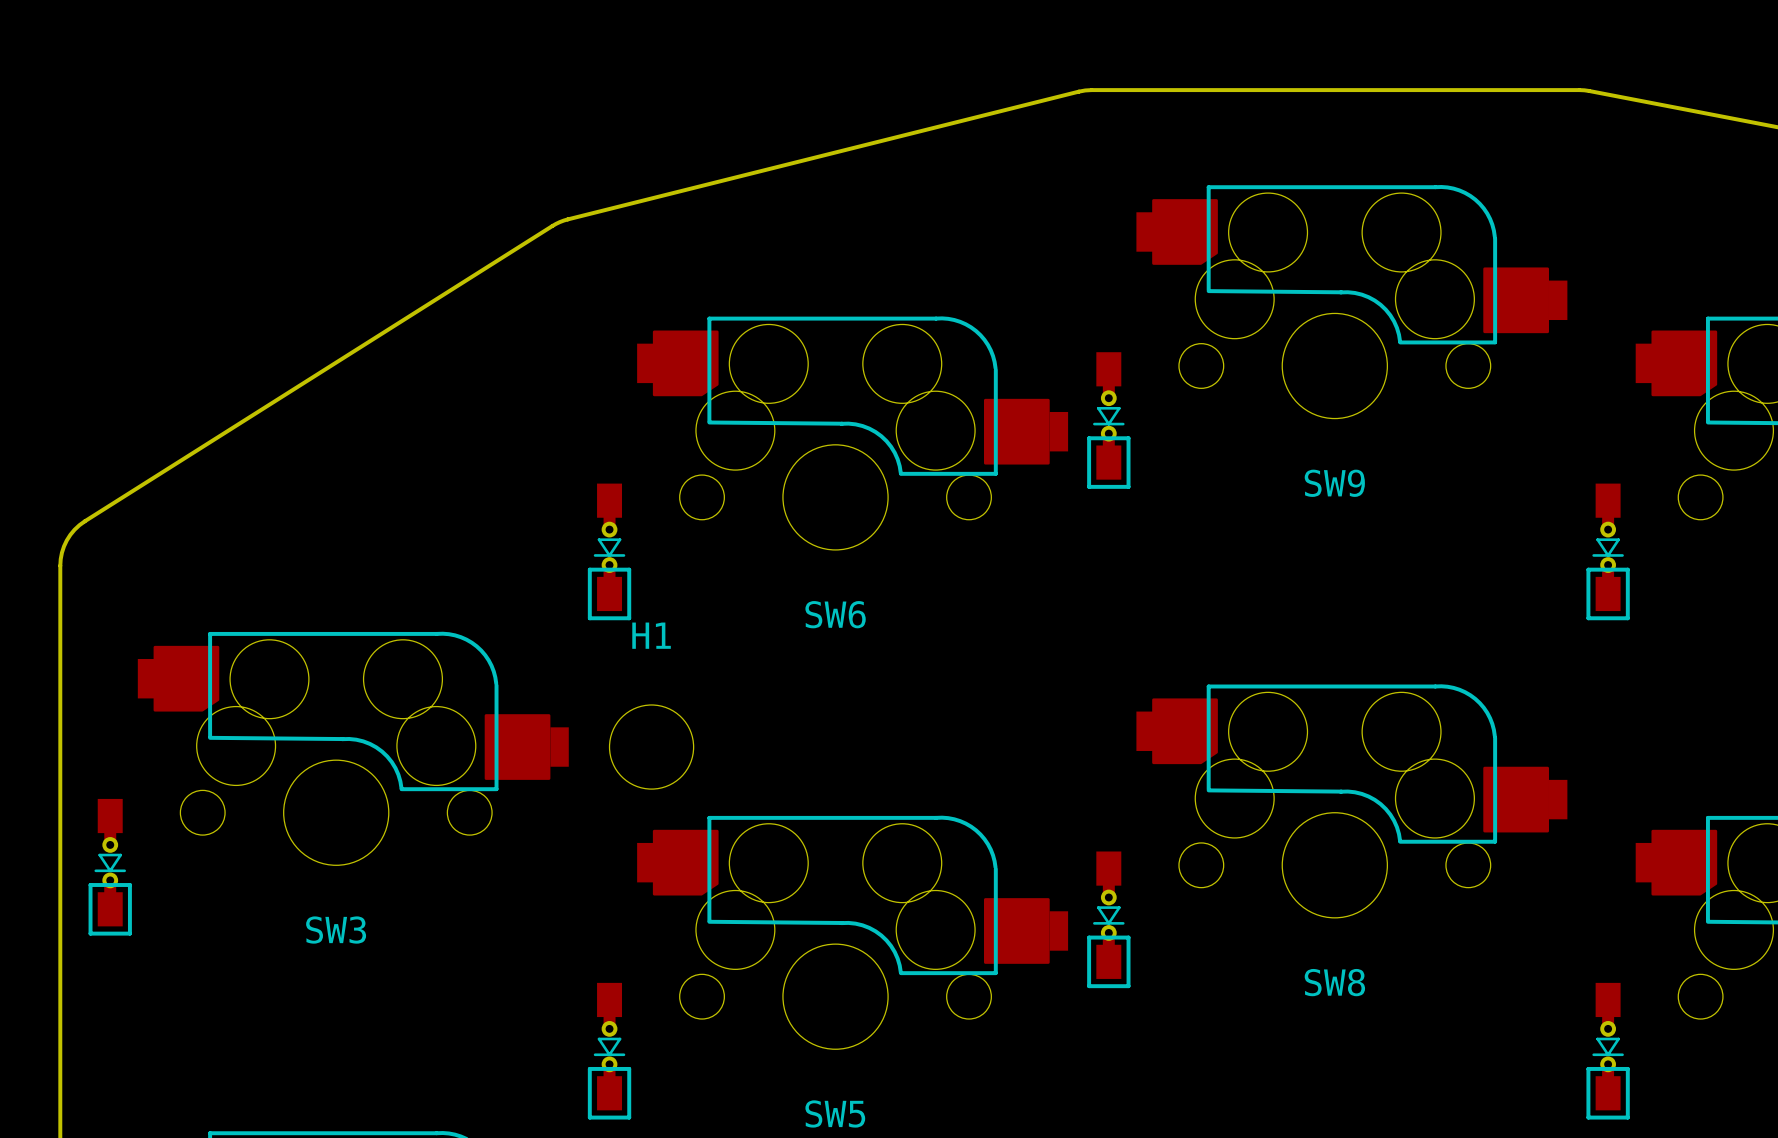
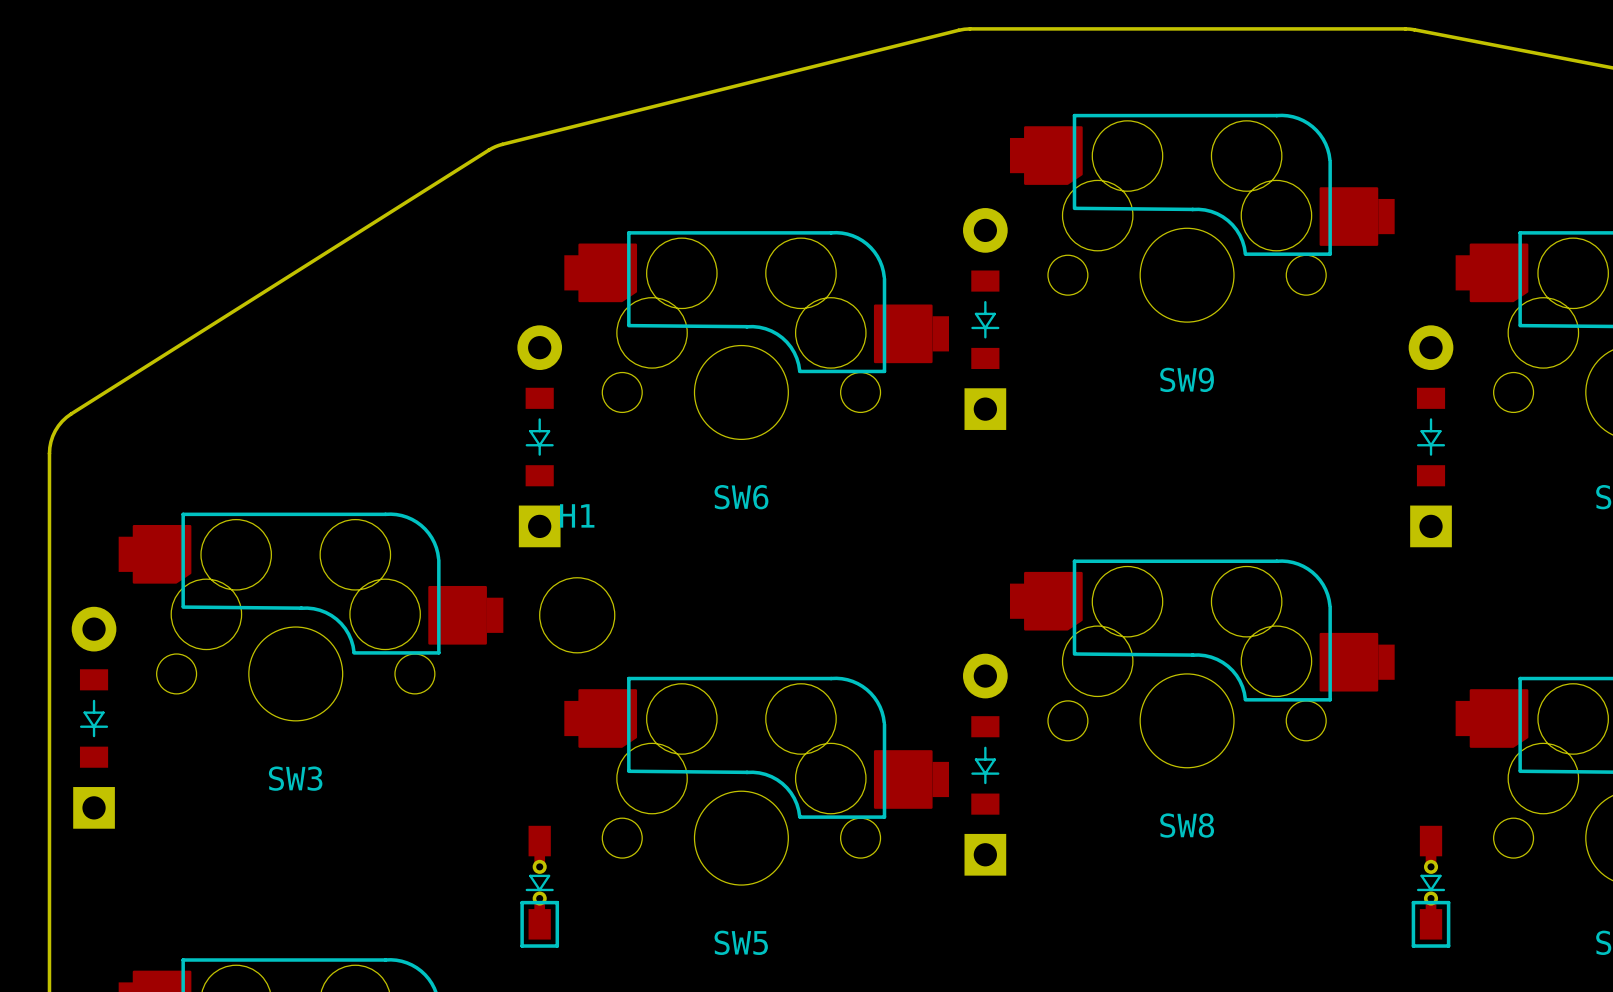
part footprint: [1087, 352, 1131, 489] -> [963, 208, 1008, 430]
part footprint: [587, 483, 632, 621] -> [517, 325, 563, 548]
part footprint: [1586, 483, 1630, 621] -> [1408, 325, 1454, 548]
part footprint: [88, 798, 132, 936] -> [71, 606, 117, 829]
part footprint: [1087, 851, 1131, 989] -> [963, 653, 1008, 876]

